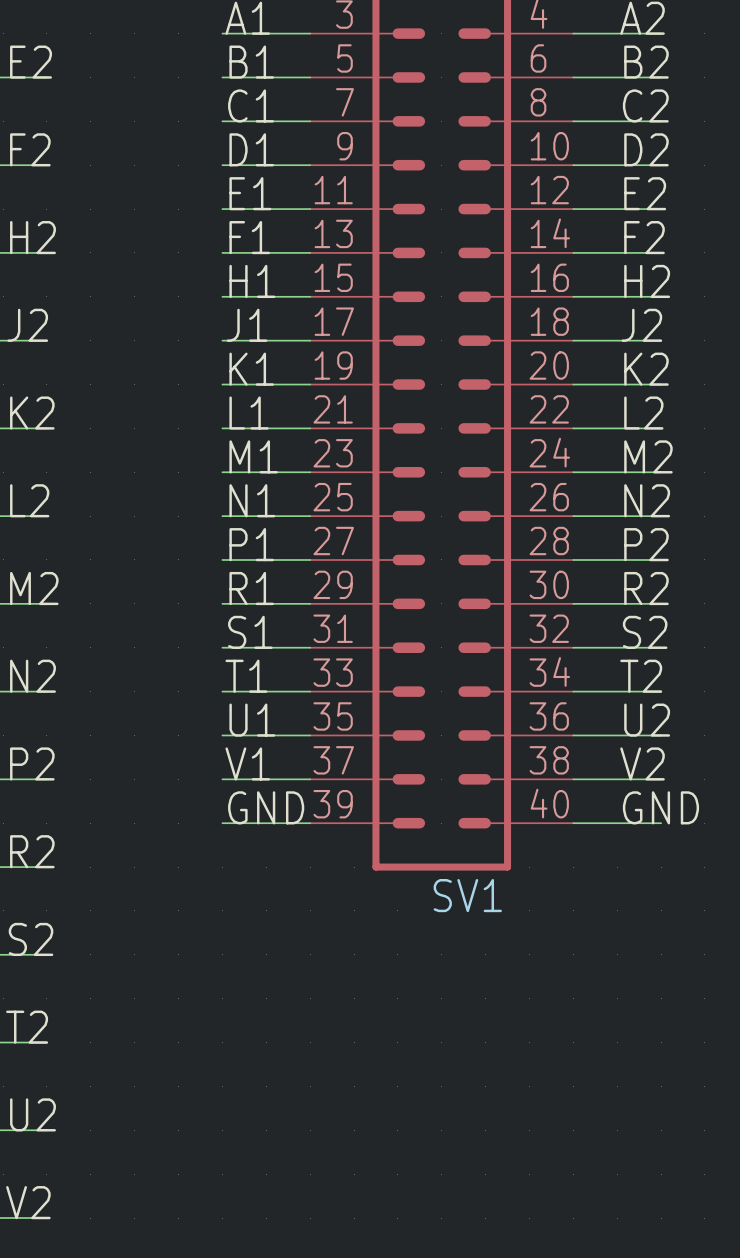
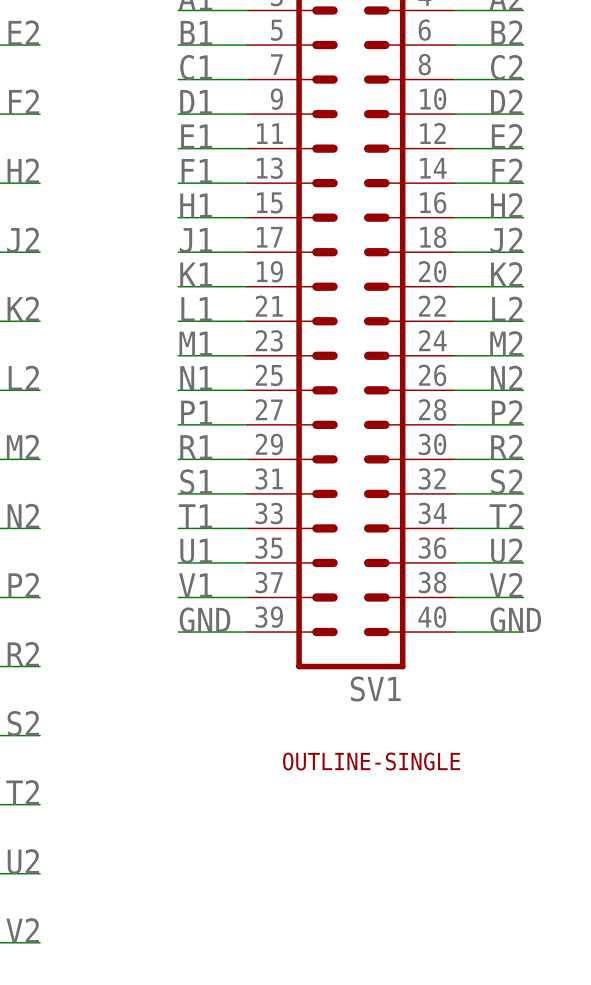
part: none -> OUTLINE-SINGLE (371, 761)

